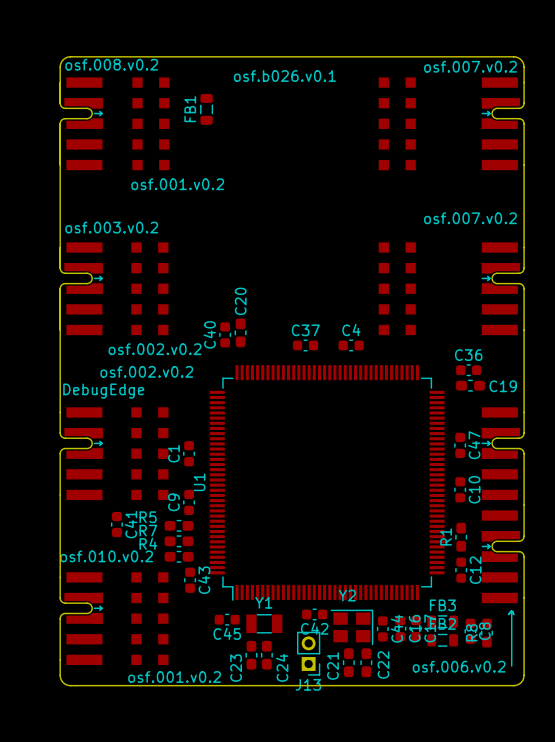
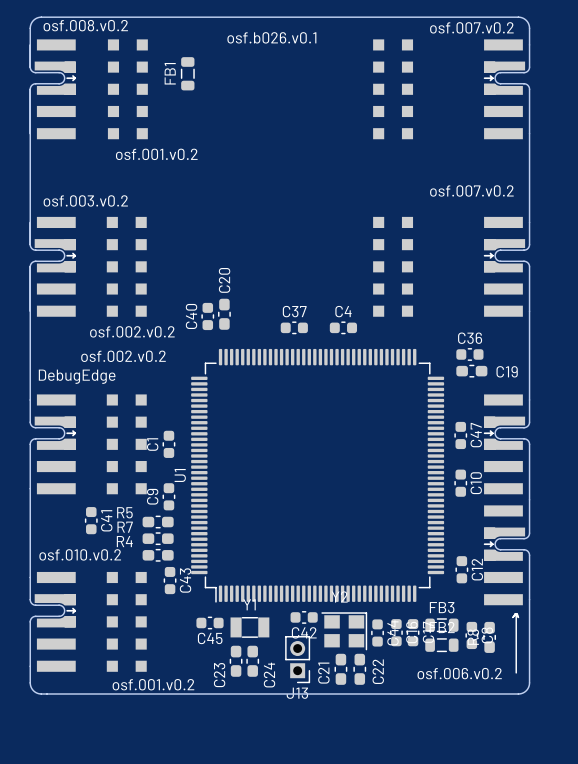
R1: (461, 537) -> none

